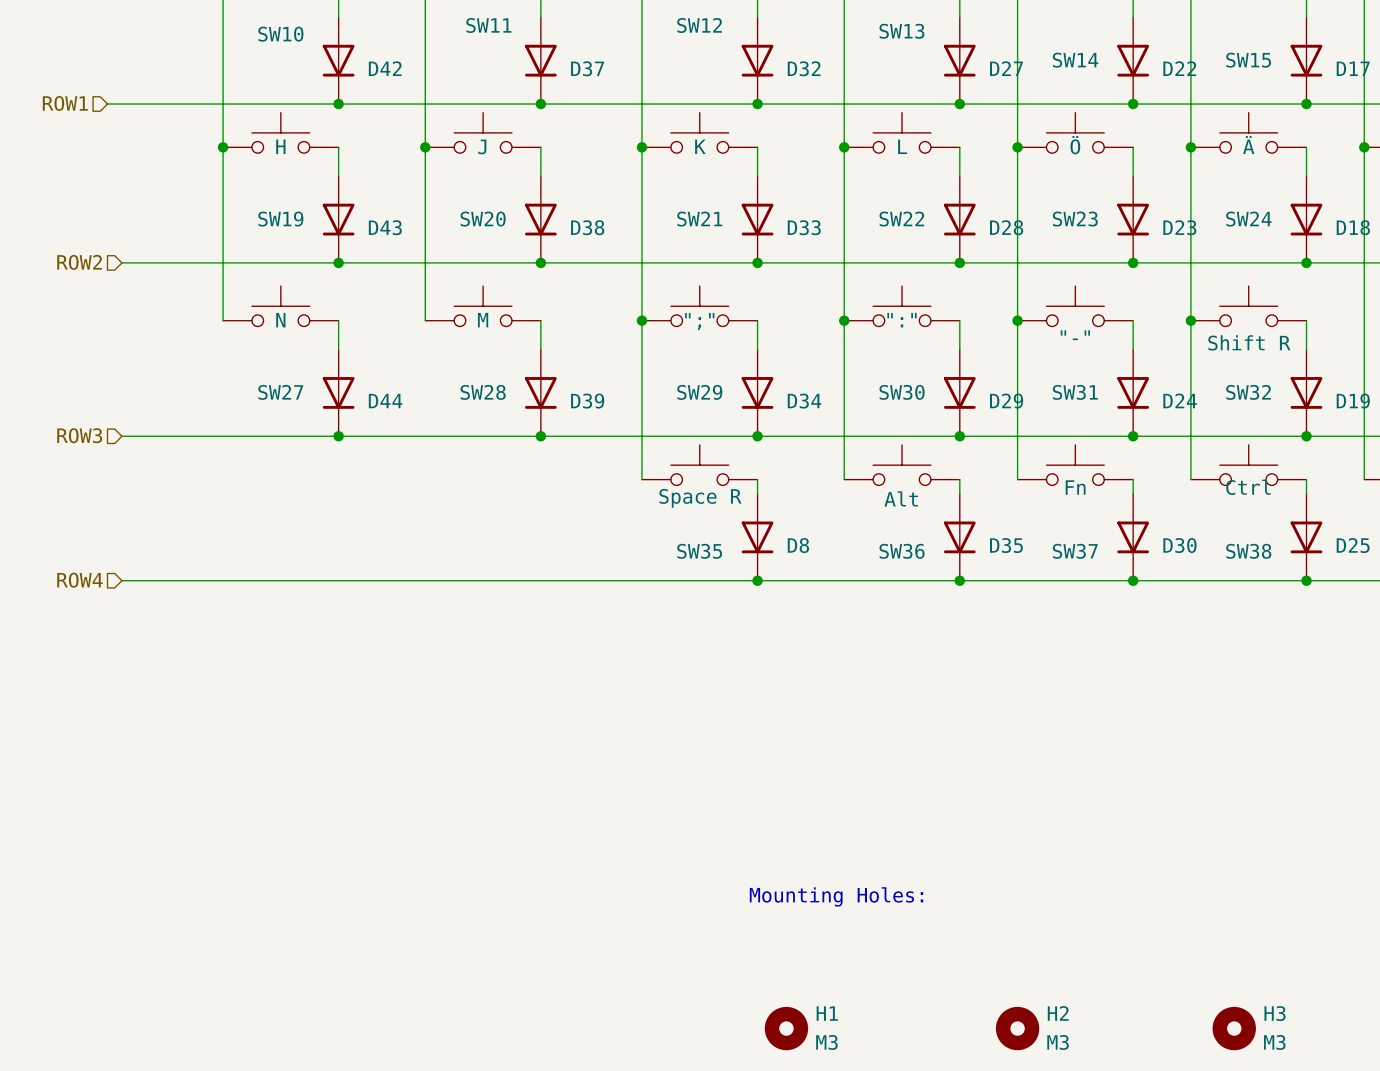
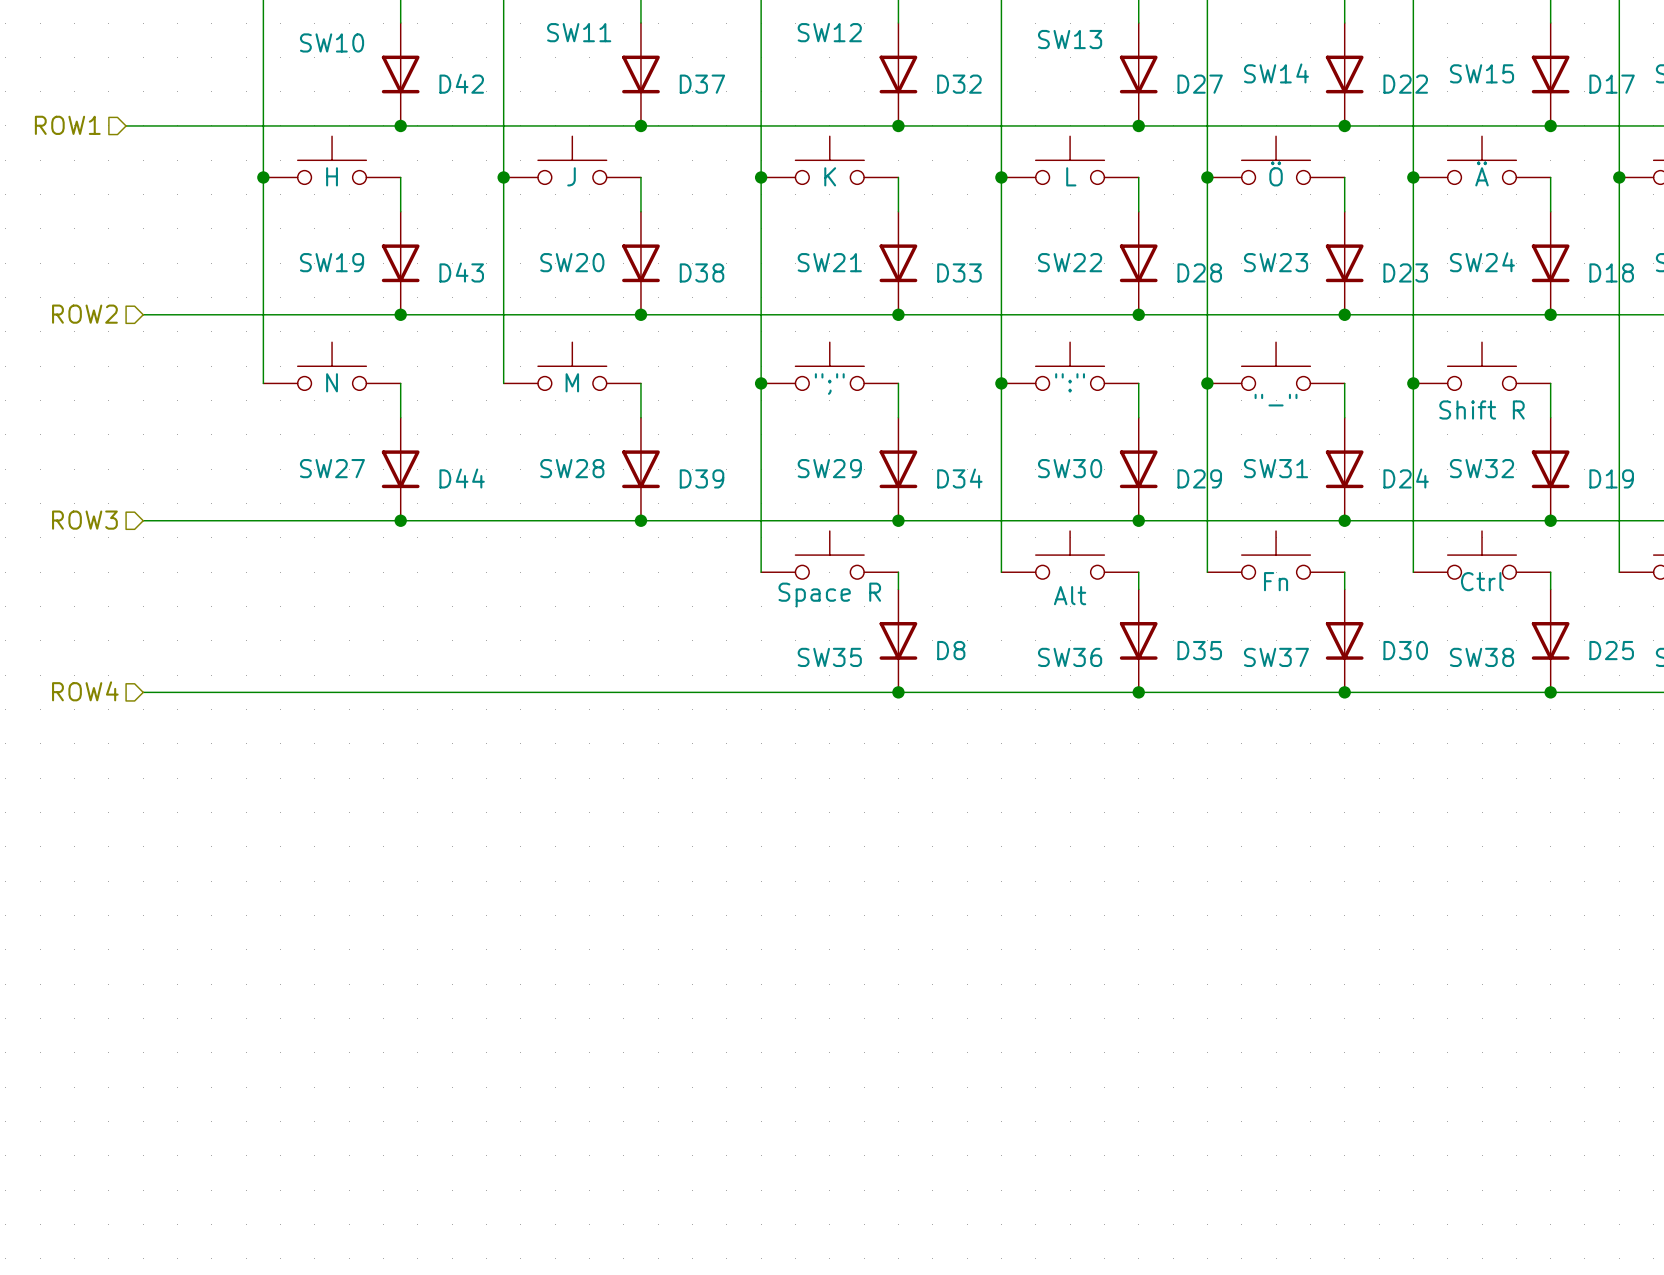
text: Mounting Holes: (836, 896) -> none
H1: M3 (786, 1028) -> none
H2: M3 (1017, 1028) -> none
H3: M3 (1234, 1028) -> none

